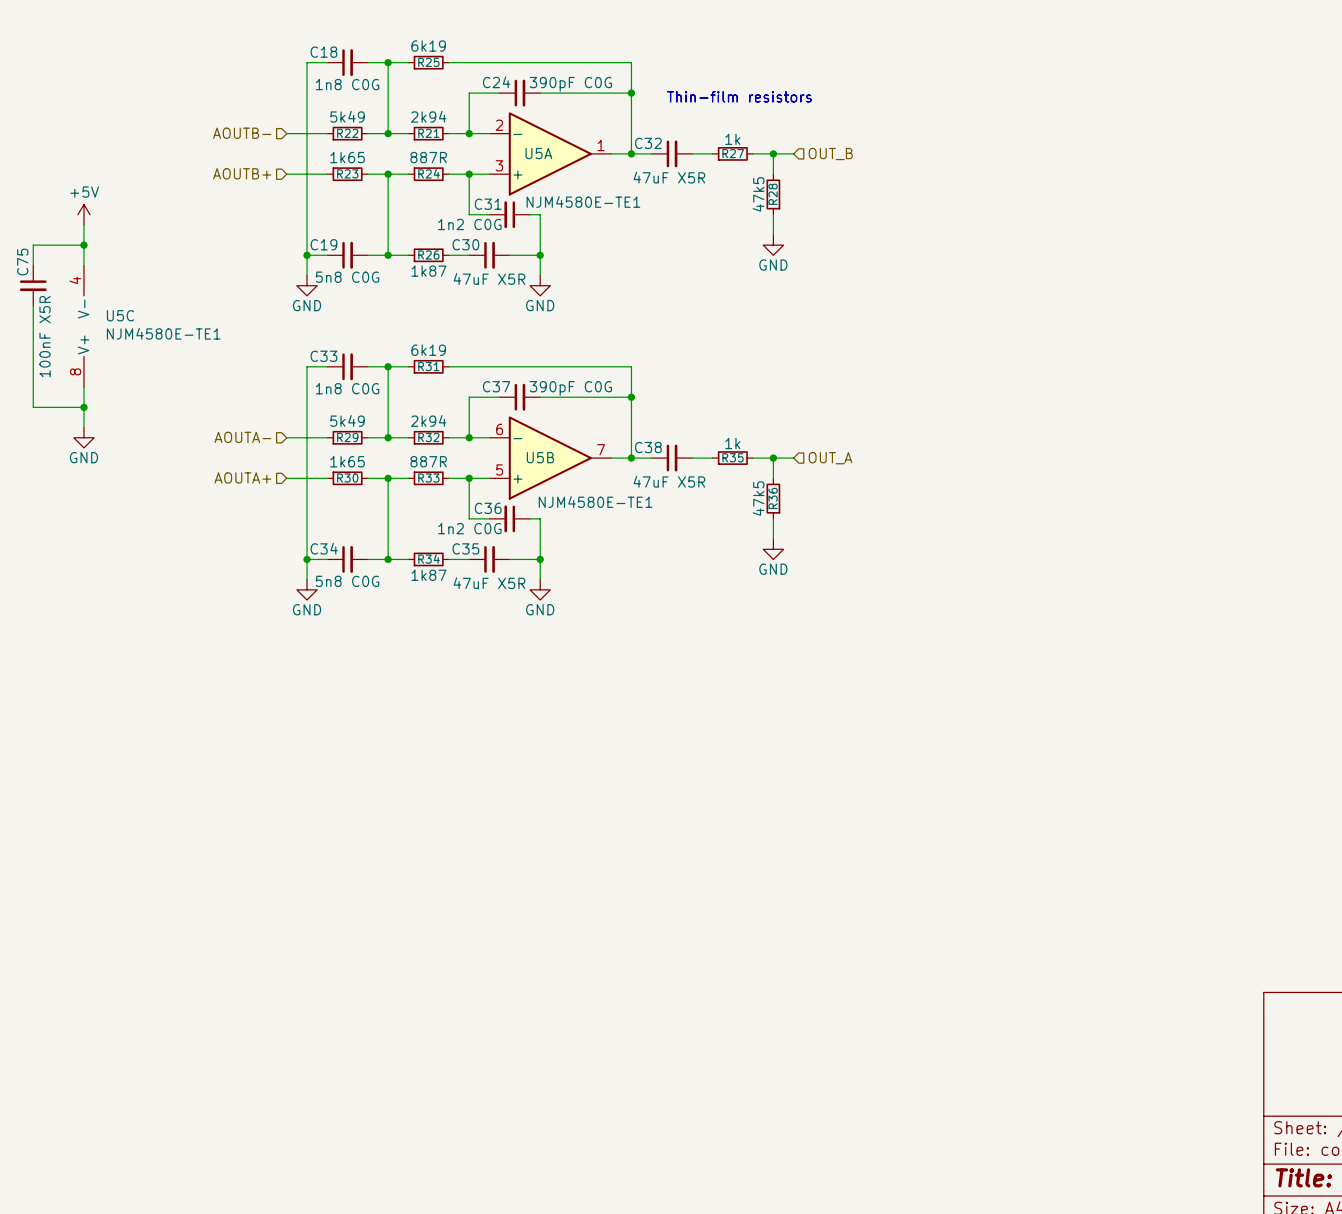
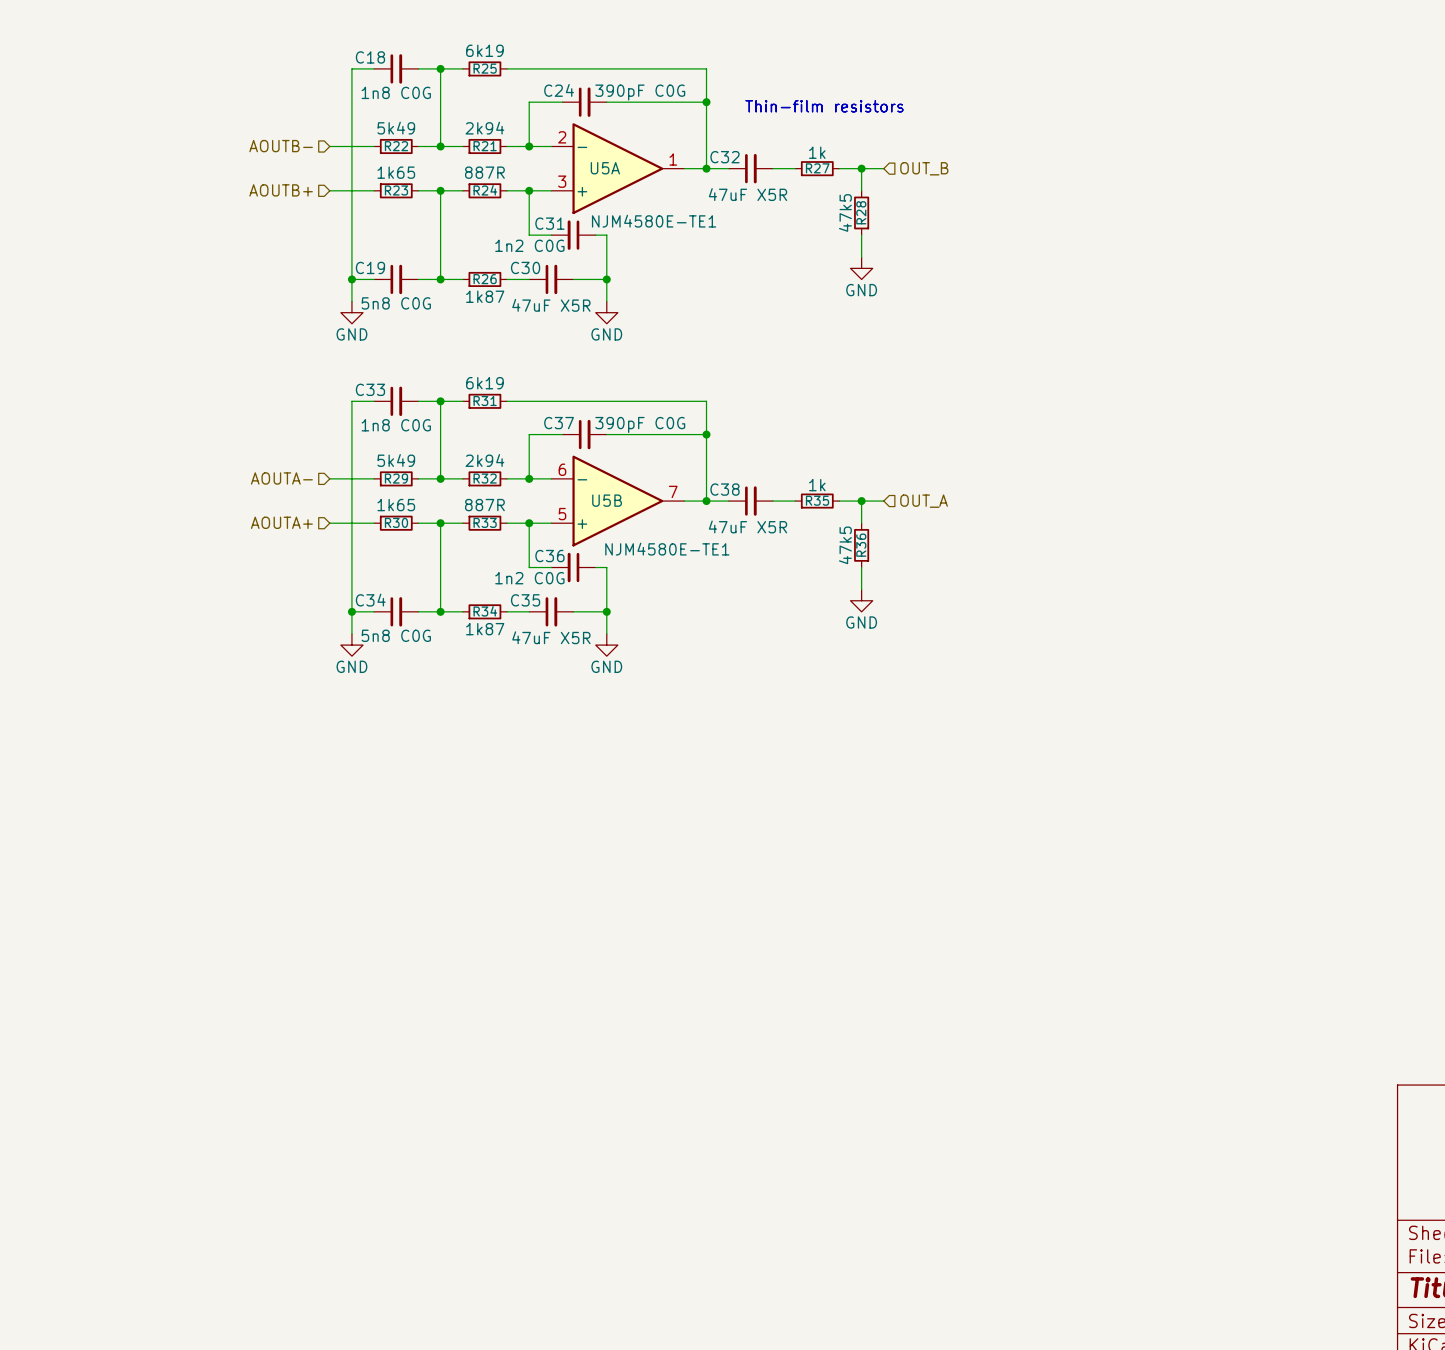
power symbol: +5V (83, 214) -> none
wire: (83, 224) (83, 265) -> none
wire: (83, 245) (33, 245) (33, 265) -> none
junction: (83, 245) -> none
C75: 100nF X5R (33, 285) -> none
wire: (33, 305) (33, 407) (83, 407) -> none
U5C: NJM4580E-TE1 (83, 326) -> none
wire: (83, 387) (83, 427) -> none
junction: (83, 407) -> none
power symbol: GND (83, 437) -> none

